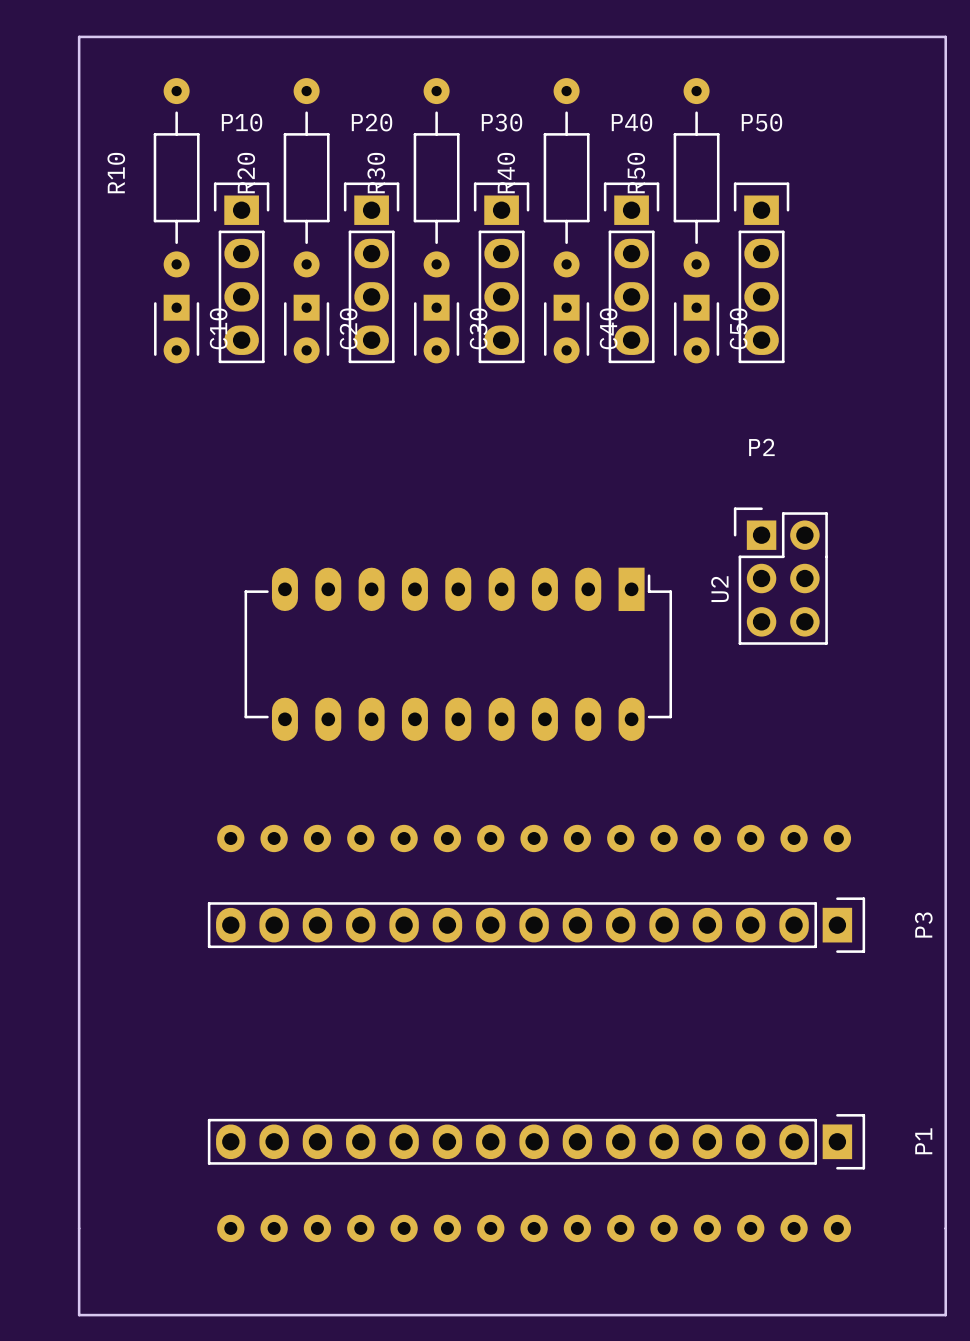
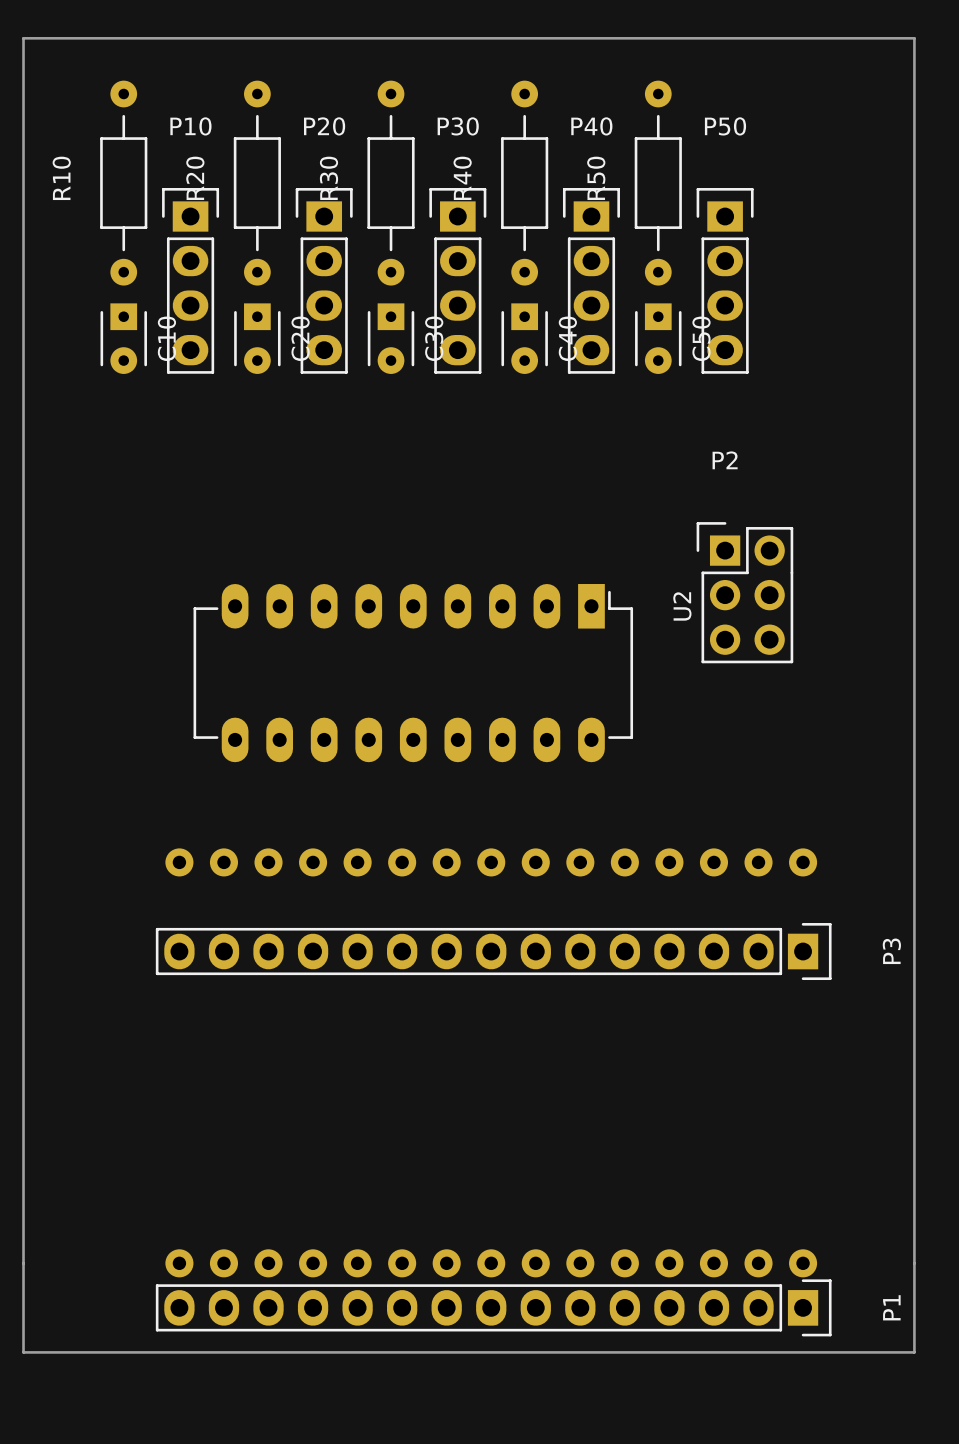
P1 position: (536, 1141) -> (493, 1307)

